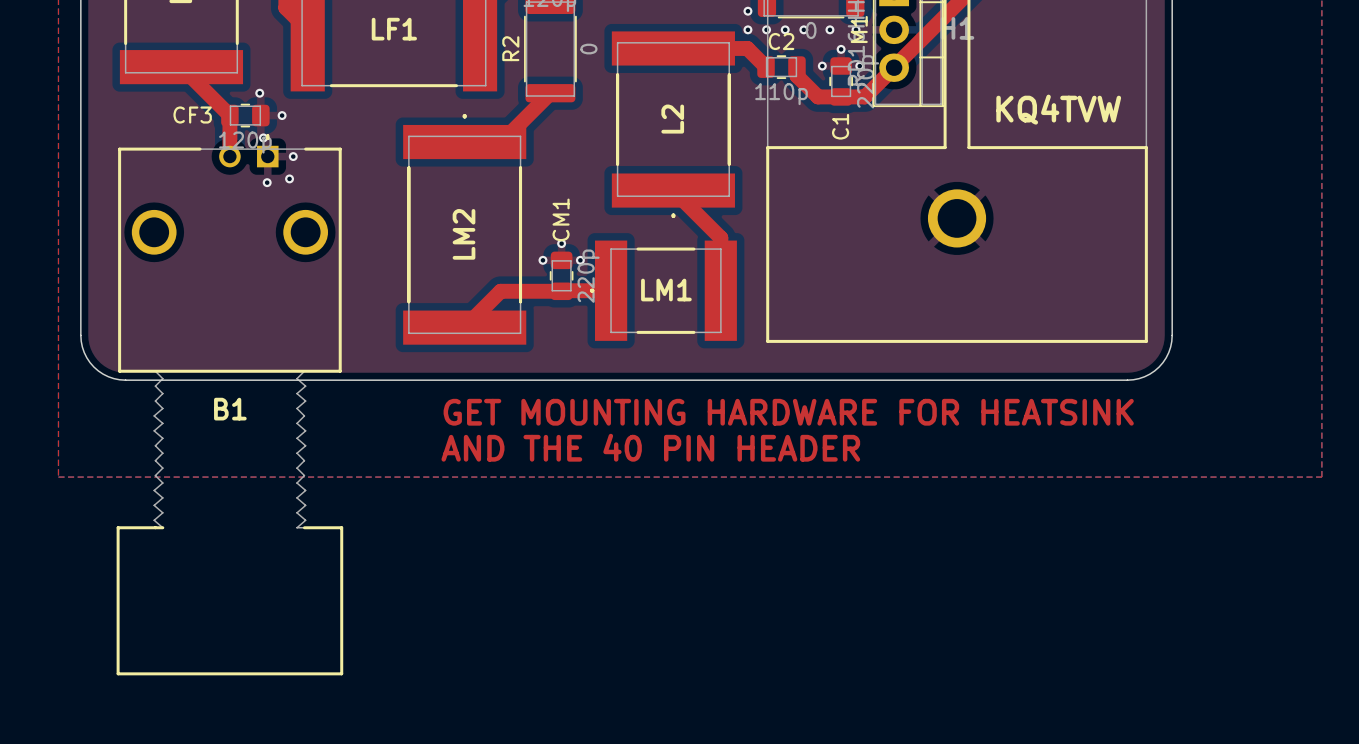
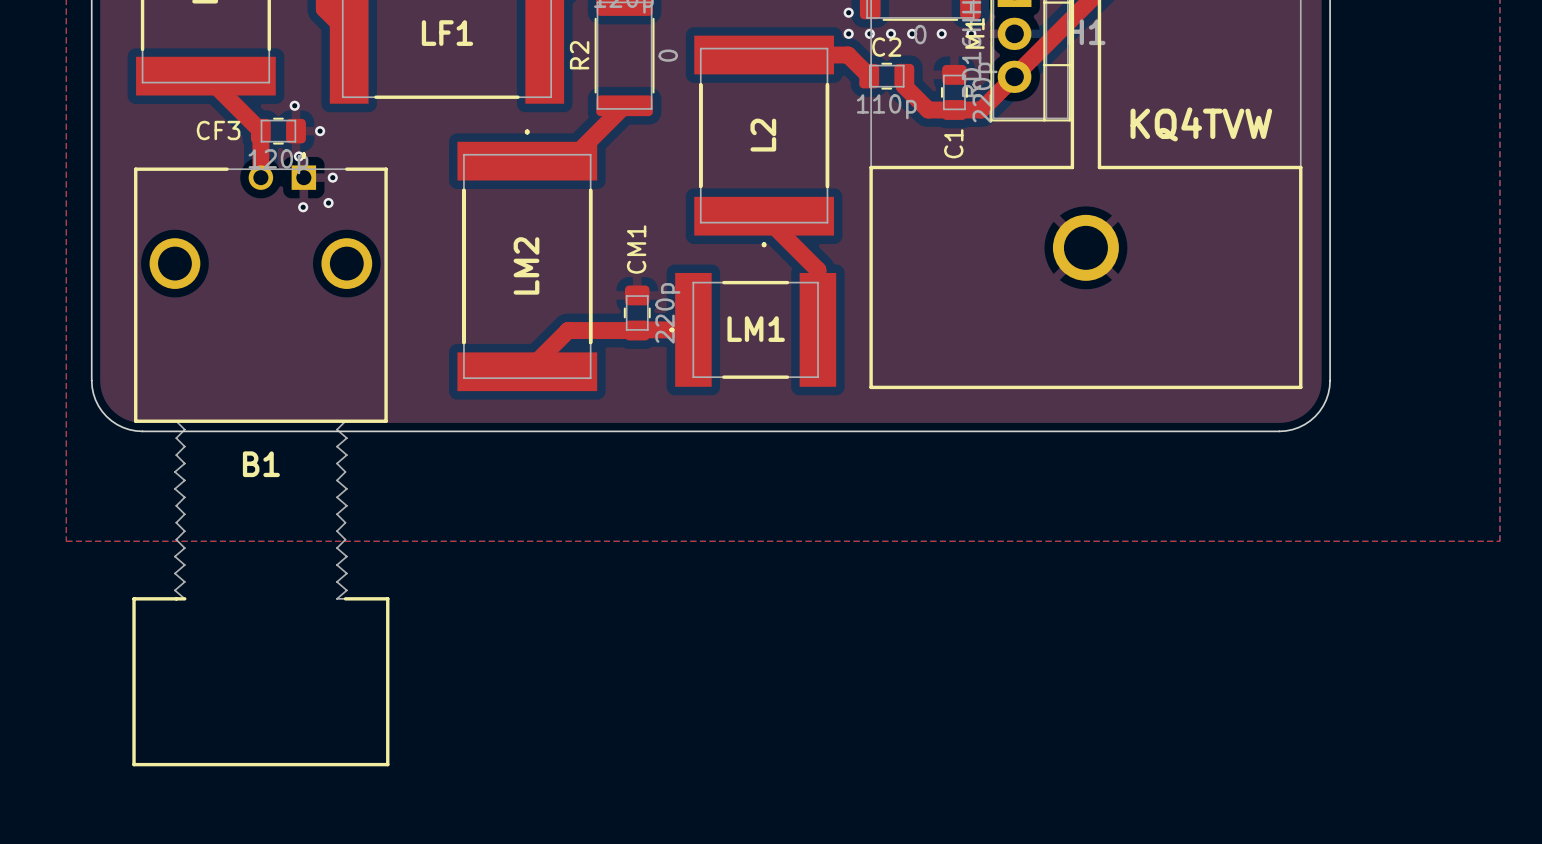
via: (841, 49) -> none
via: (822, 66) -> none
via: (859, 66) -> none
via: (561, 243) -> none
via: (542, 260) -> none
via: (580, 260) -> none
text: GET MOUNTING HARDWARE FOR HEATSINK (788, 412) -> none
text: AND THE 40 PIN HEADER (650, 447) -> none

